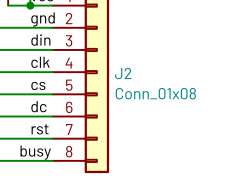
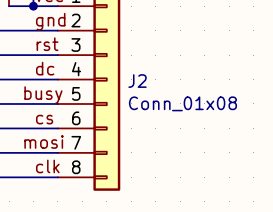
label: din (40, 40) -> rst (47, 44)
label: clk (40, 62) -> dc (45, 68)
label: cs (38, 85) -> none
label: dc (38, 106) -> cs (44, 119)
label: none -> mosi (44, 141)
label: rst (40, 129) -> none
label: none -> clk (47, 166)
label position: busy (35, 152) -> busy (43, 95)

